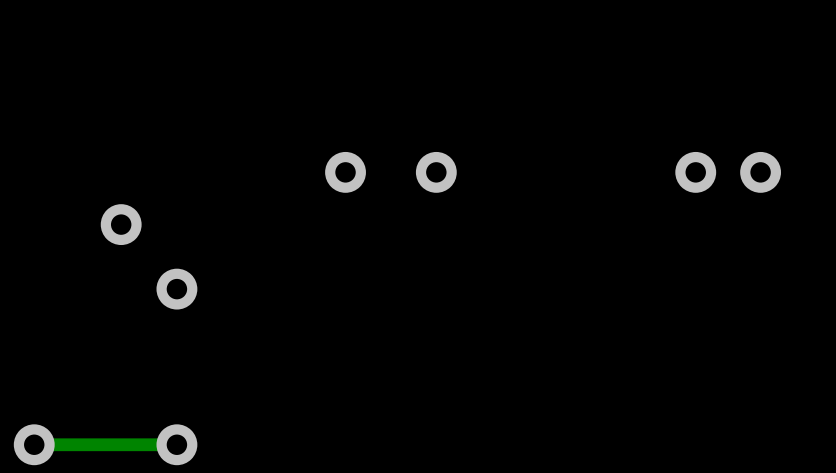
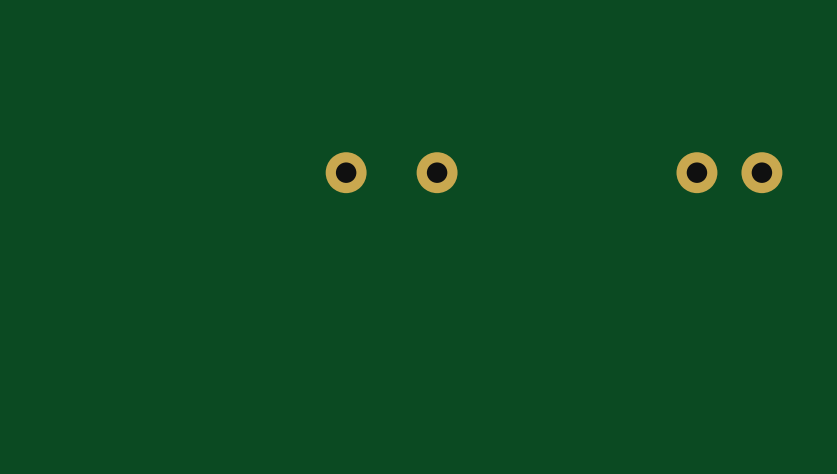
via: (121, 224) -> none
via: (176, 289) -> none
via: (34, 444) -> none
track: (176, 444) (34, 444) -> none
via: (176, 444) -> none

